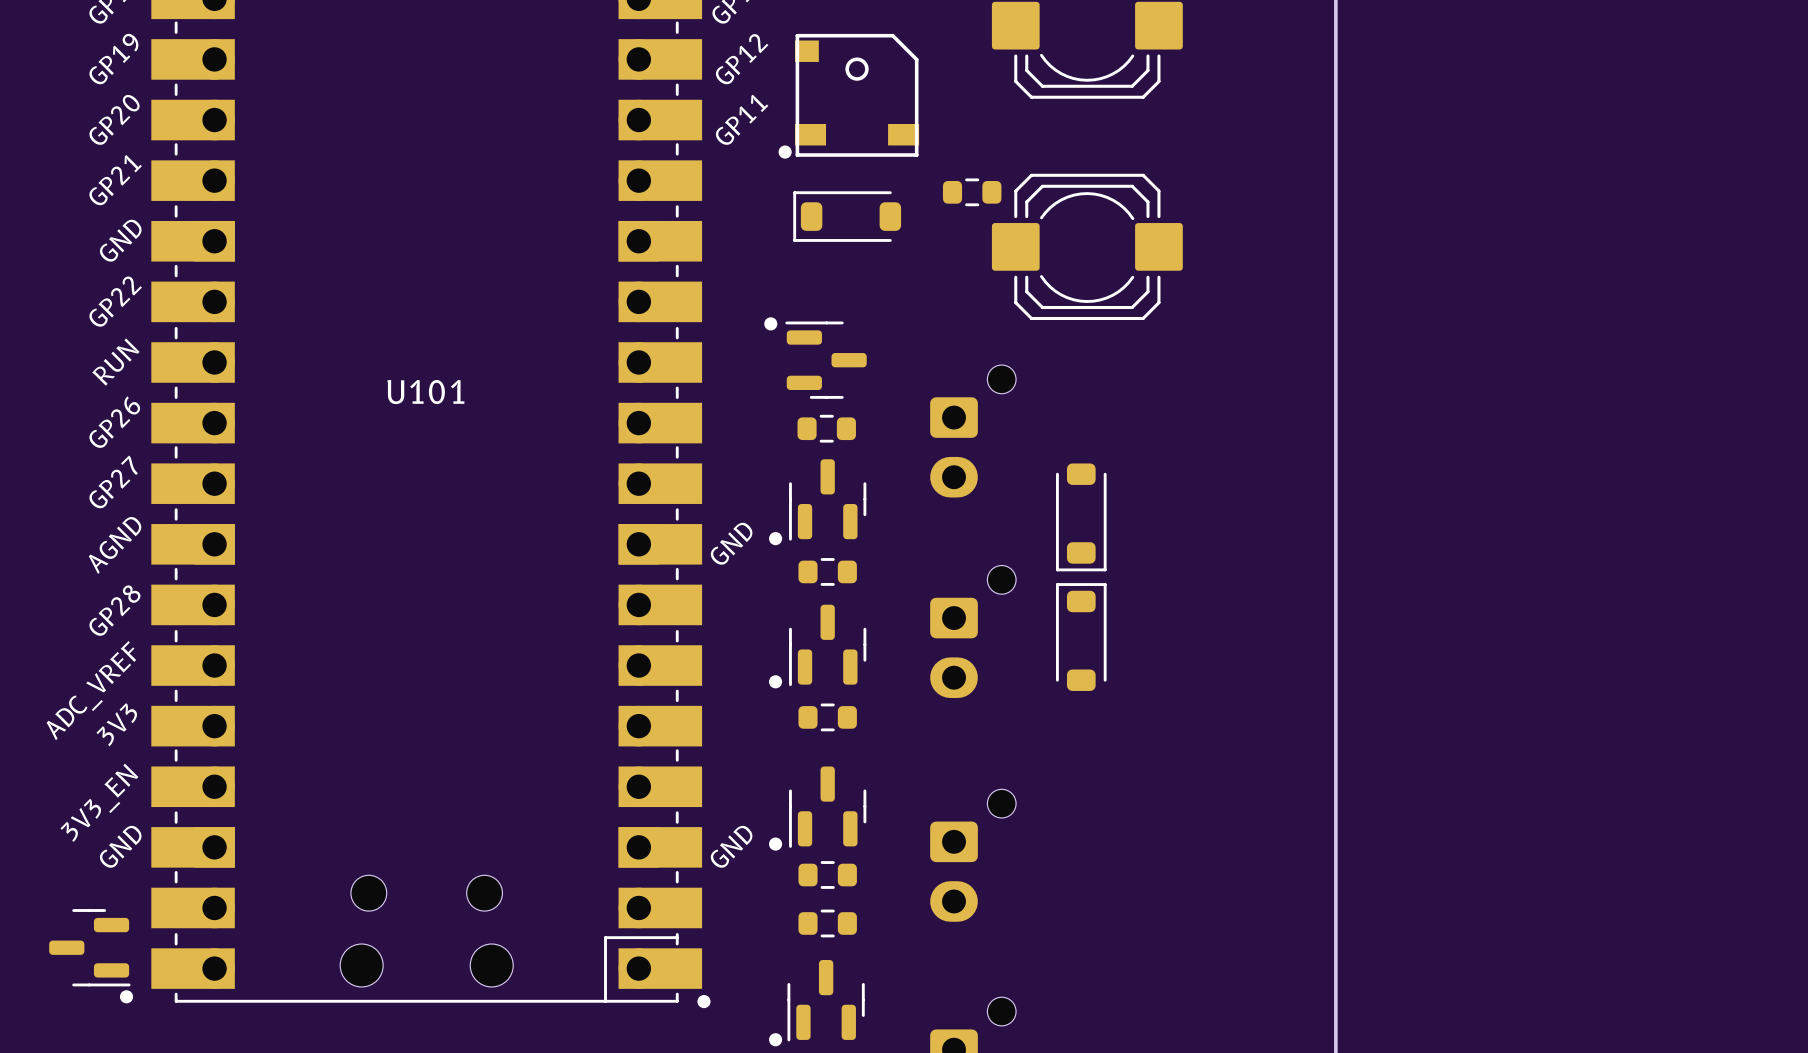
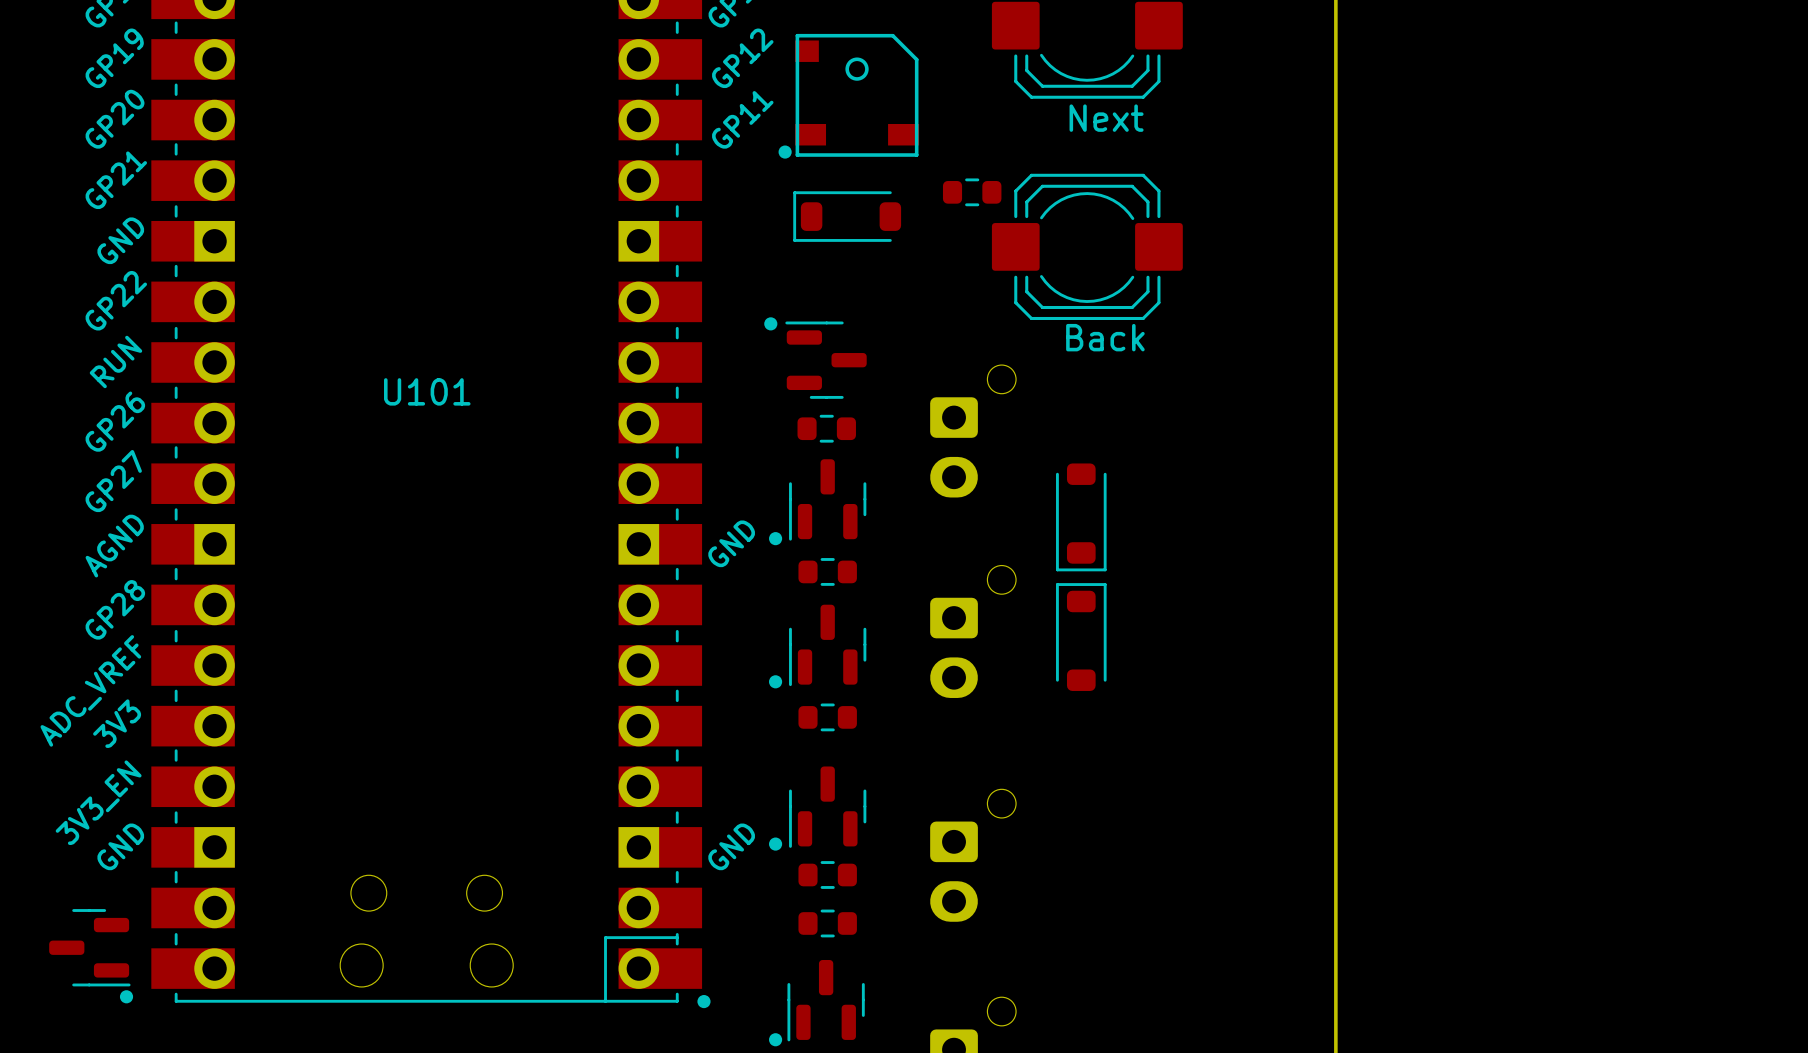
text: none -> Next (1106, 118)
text: none -> Back (1105, 337)

